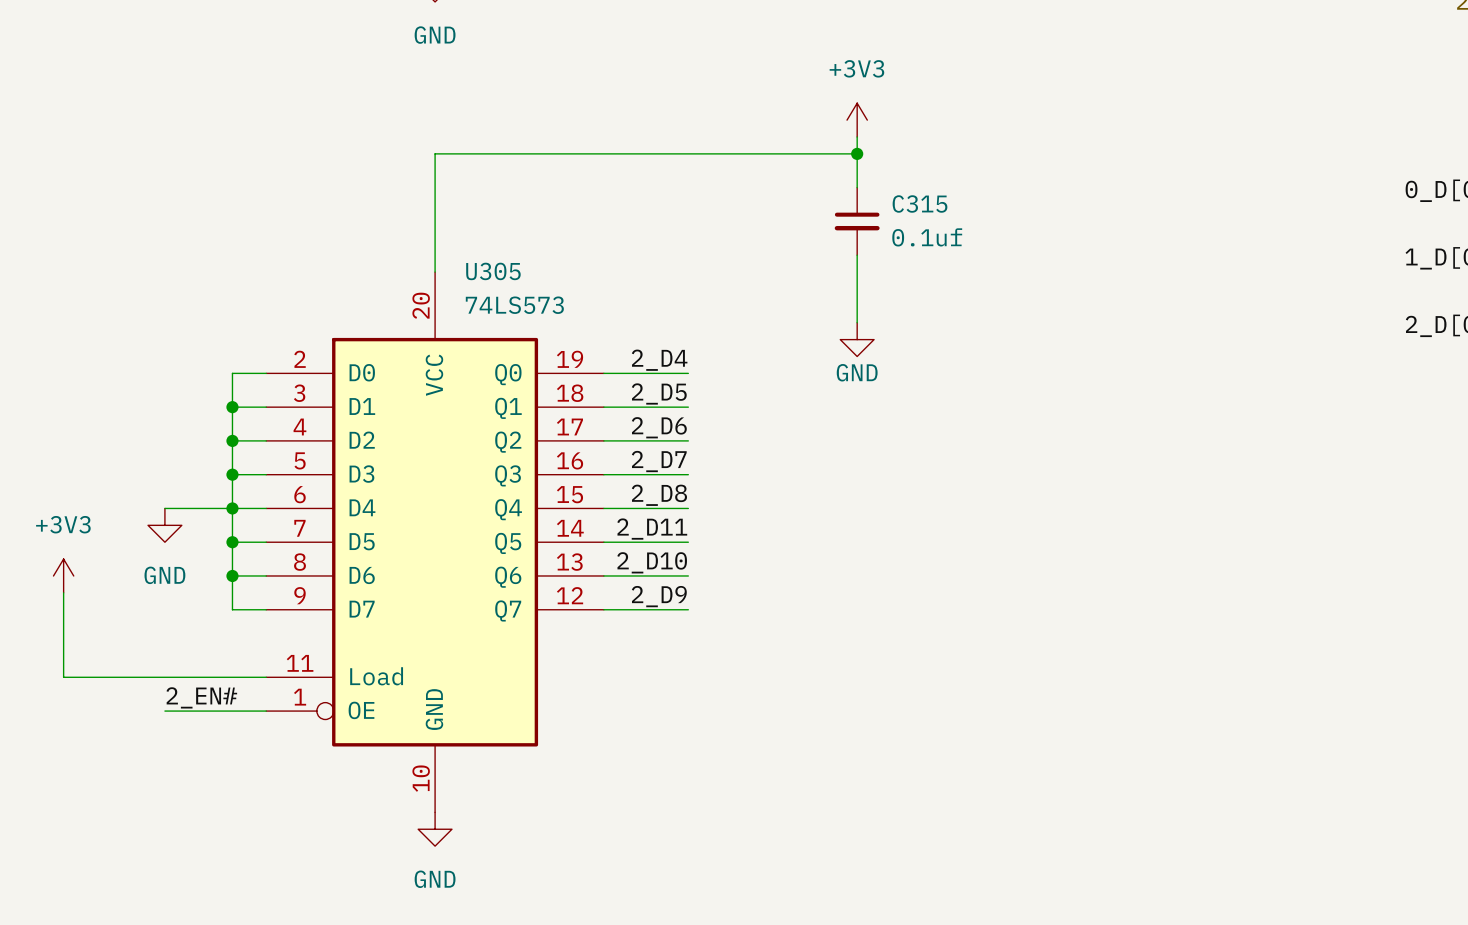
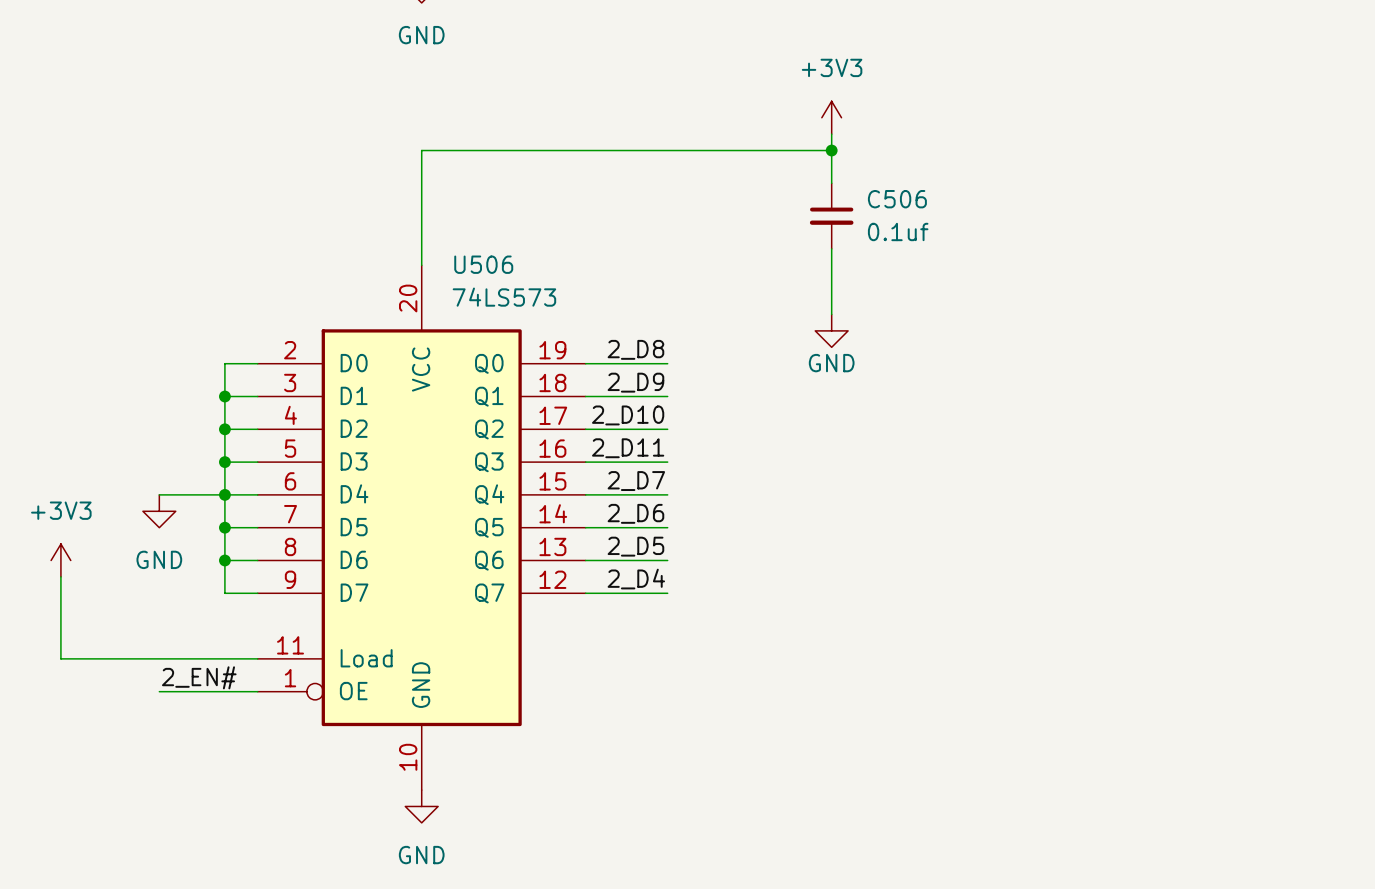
C315 name: C315 (920, 203) -> C506 (897, 199)
U305 name: U305 (493, 271) -> U506 (483, 264)
label: 2_D4 (659, 360) -> 2_D8 (635, 349)
label: 2_D5 (659, 393) -> 2_D9 (635, 382)
label: 2_D6 (659, 427) -> 2_D10 (628, 415)
label: 2_D7 (659, 461) -> 2_D11 (628, 448)
label: 2_D8 (659, 495) -> 2_D7 (636, 481)
label: 2_D11 (652, 529) -> 2_D6 (635, 513)
label: 2_D10 (652, 562) -> 2_D5 (635, 546)
label: 2_D9 (659, 596) -> 2_D4 (636, 579)

